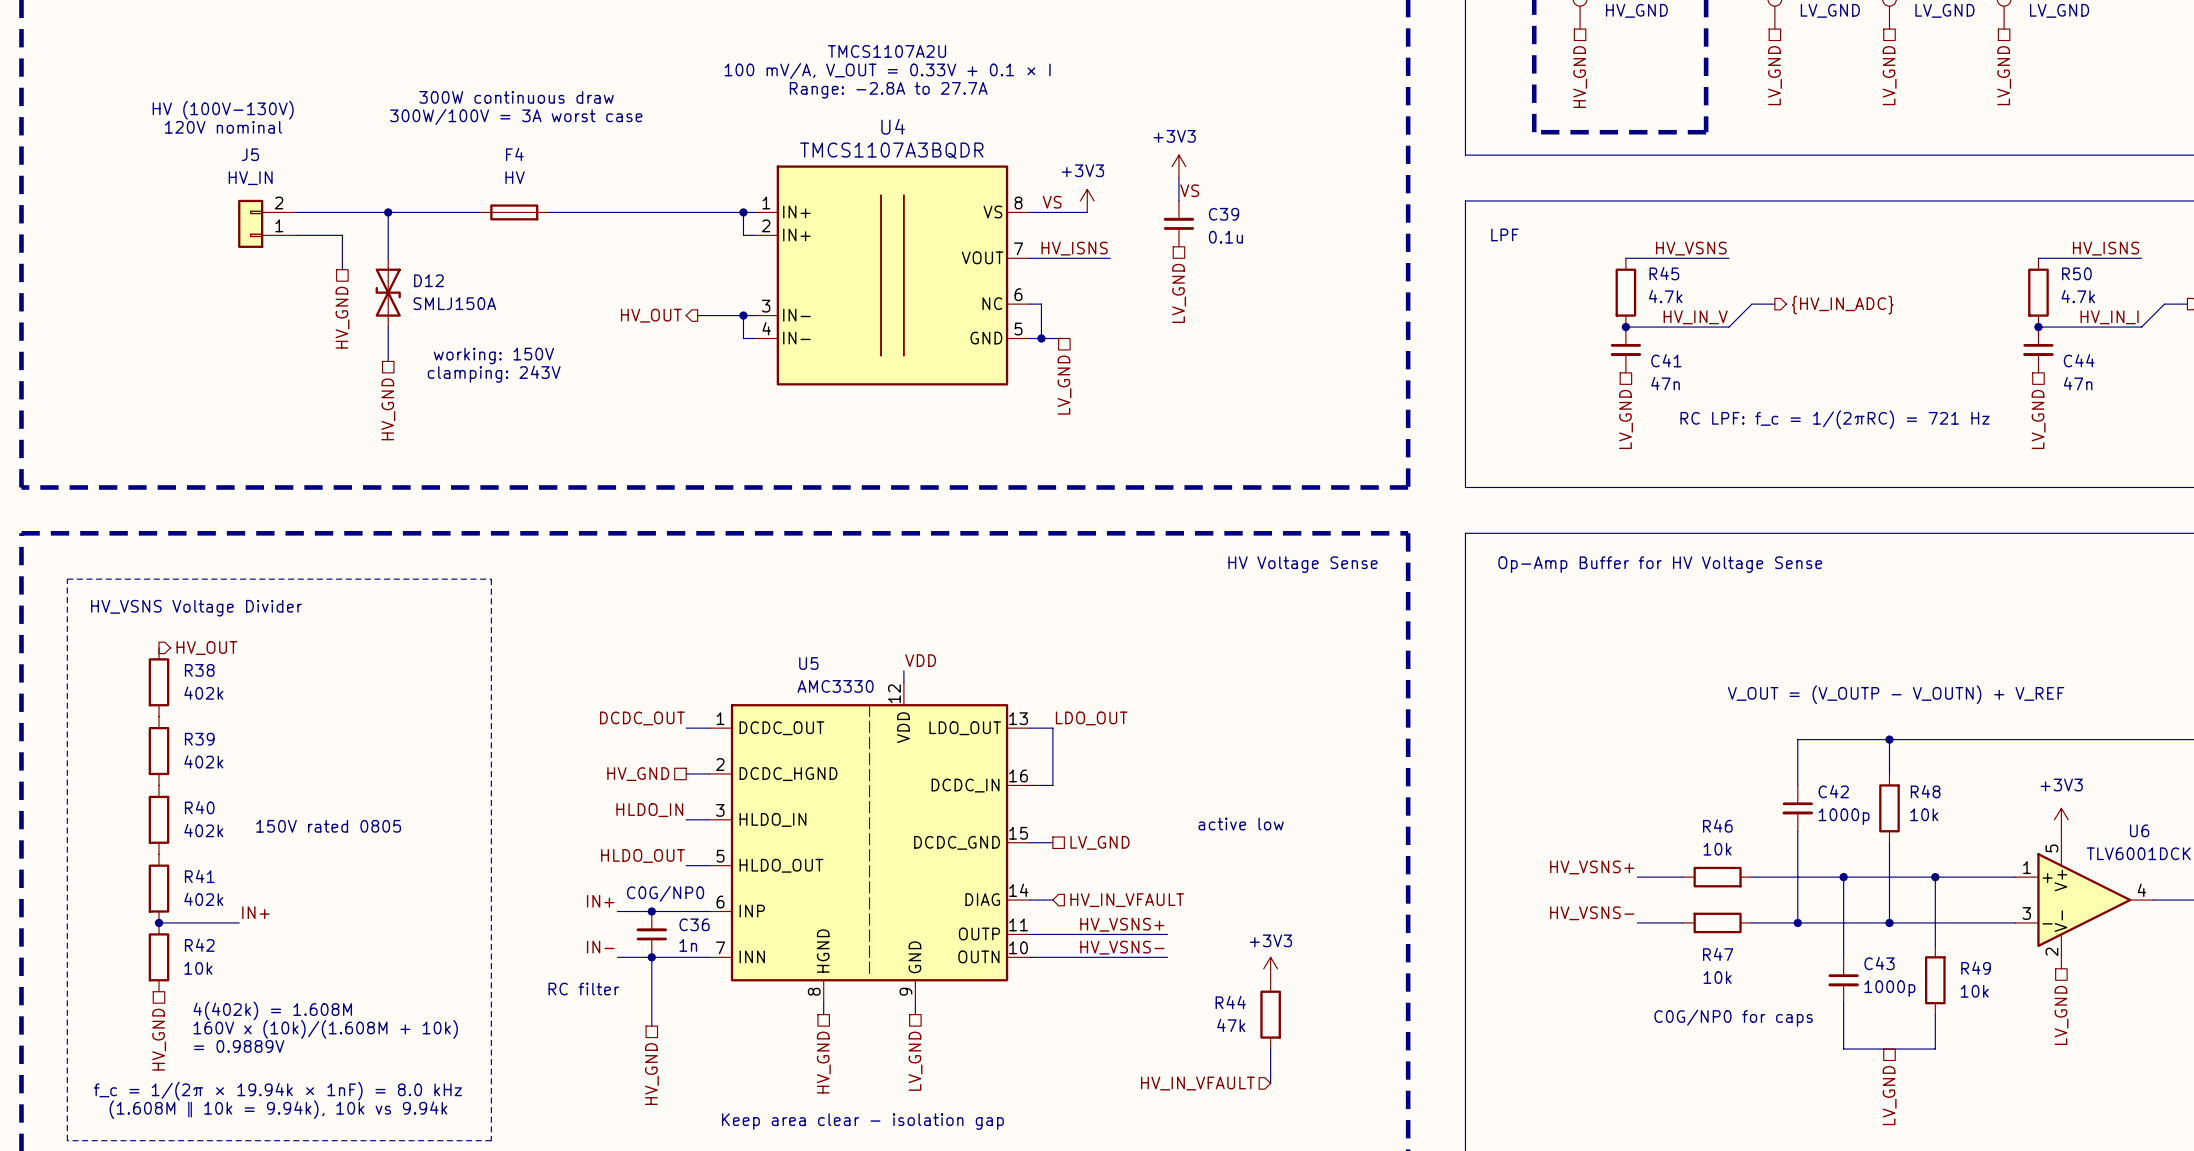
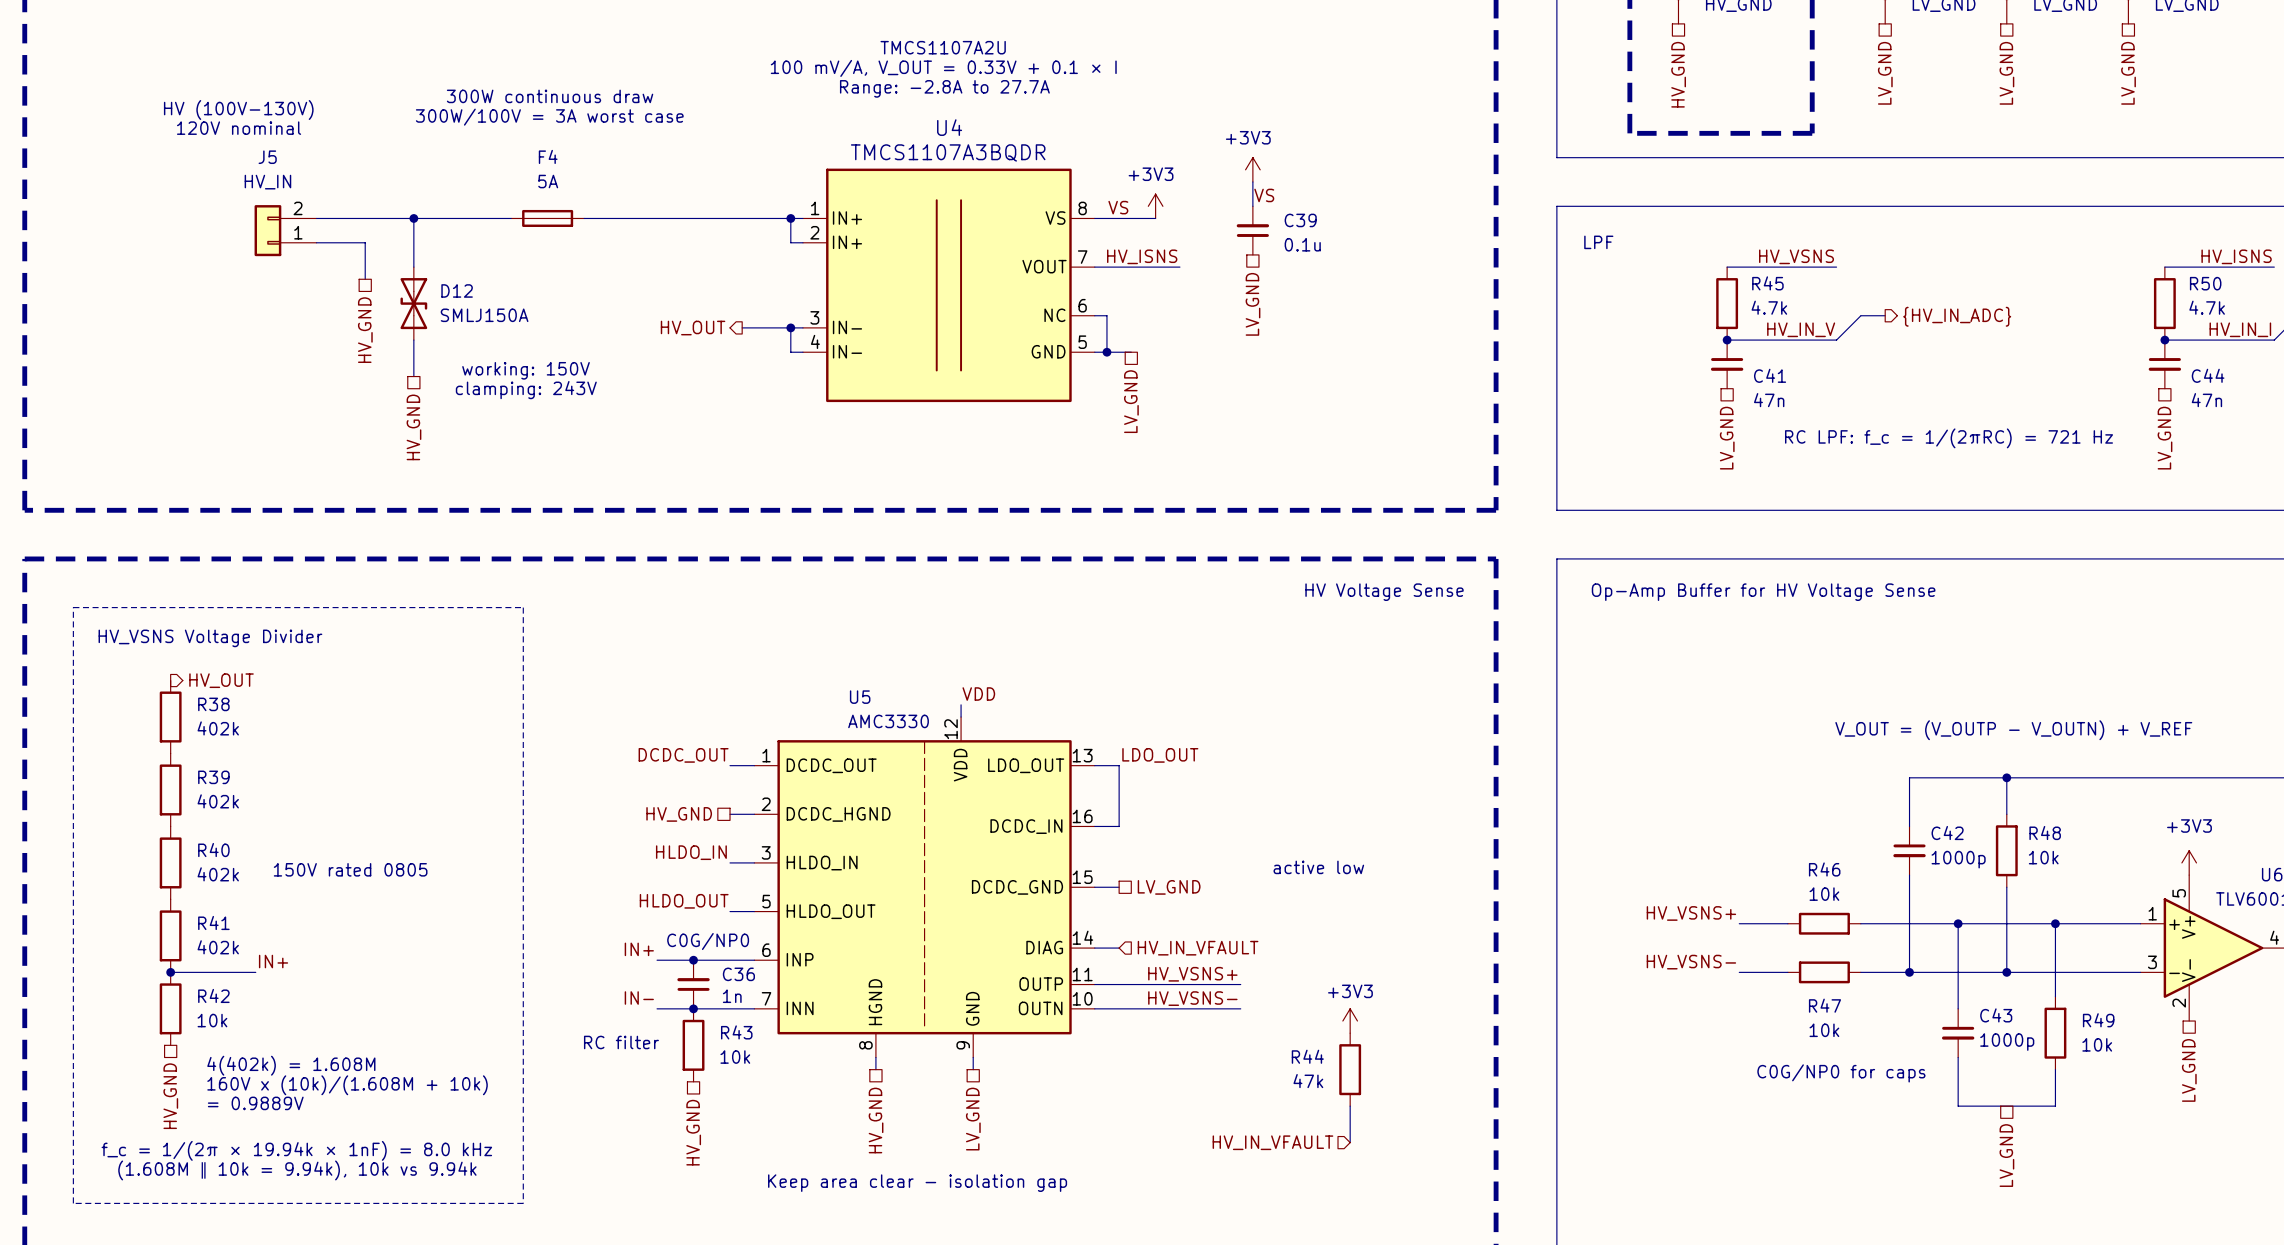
F4 value: HV (515, 177) -> 5A (548, 181)
wire: (651, 957) (651, 1026) -> none
R43: none -> 10k (693, 1045)

